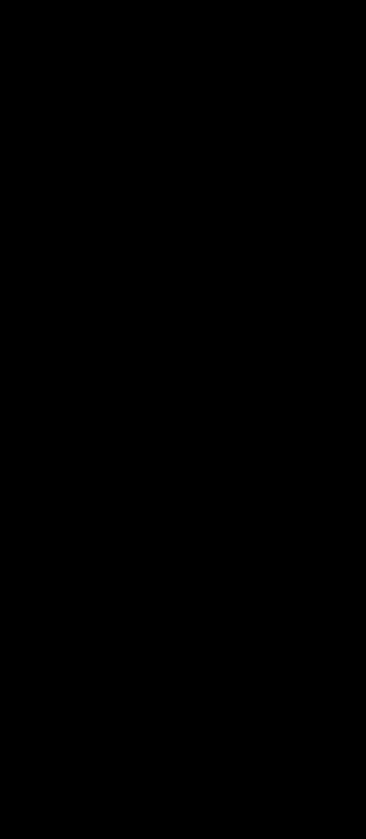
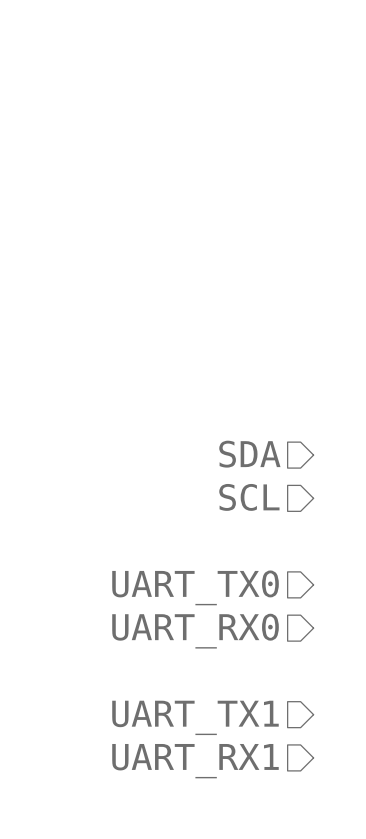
hierarchical label: none -> SDA (249, 454)
hierarchical label: none -> SCL (249, 497)
hierarchical label: none -> UART_TX0 (195, 587)
hierarchical label: none -> UART_RX0 (195, 631)
hierarchical label: none -> UART_TX1 (195, 717)
hierarchical label: none -> UART_RX1 (195, 761)

